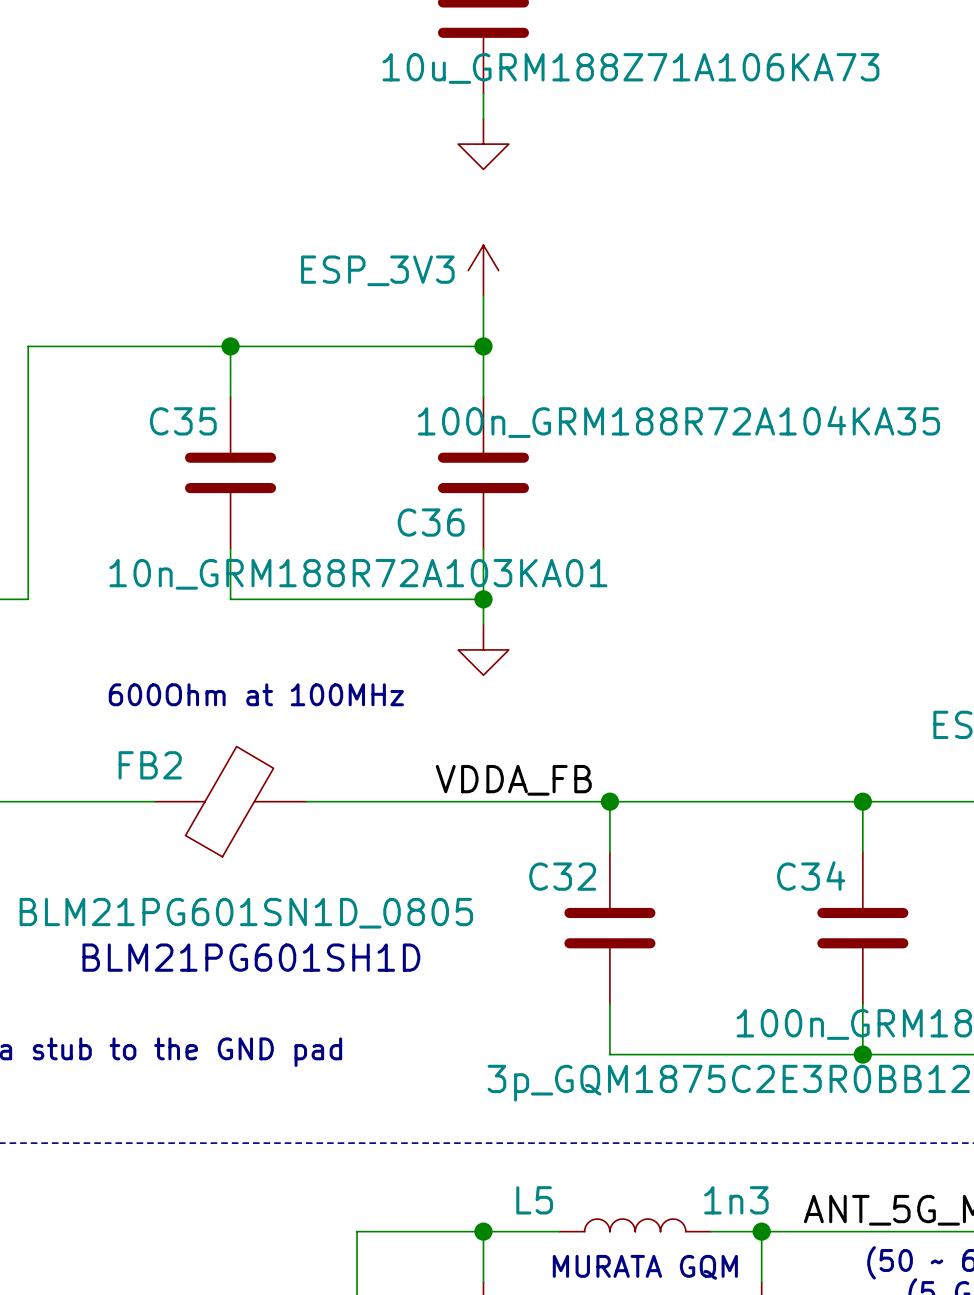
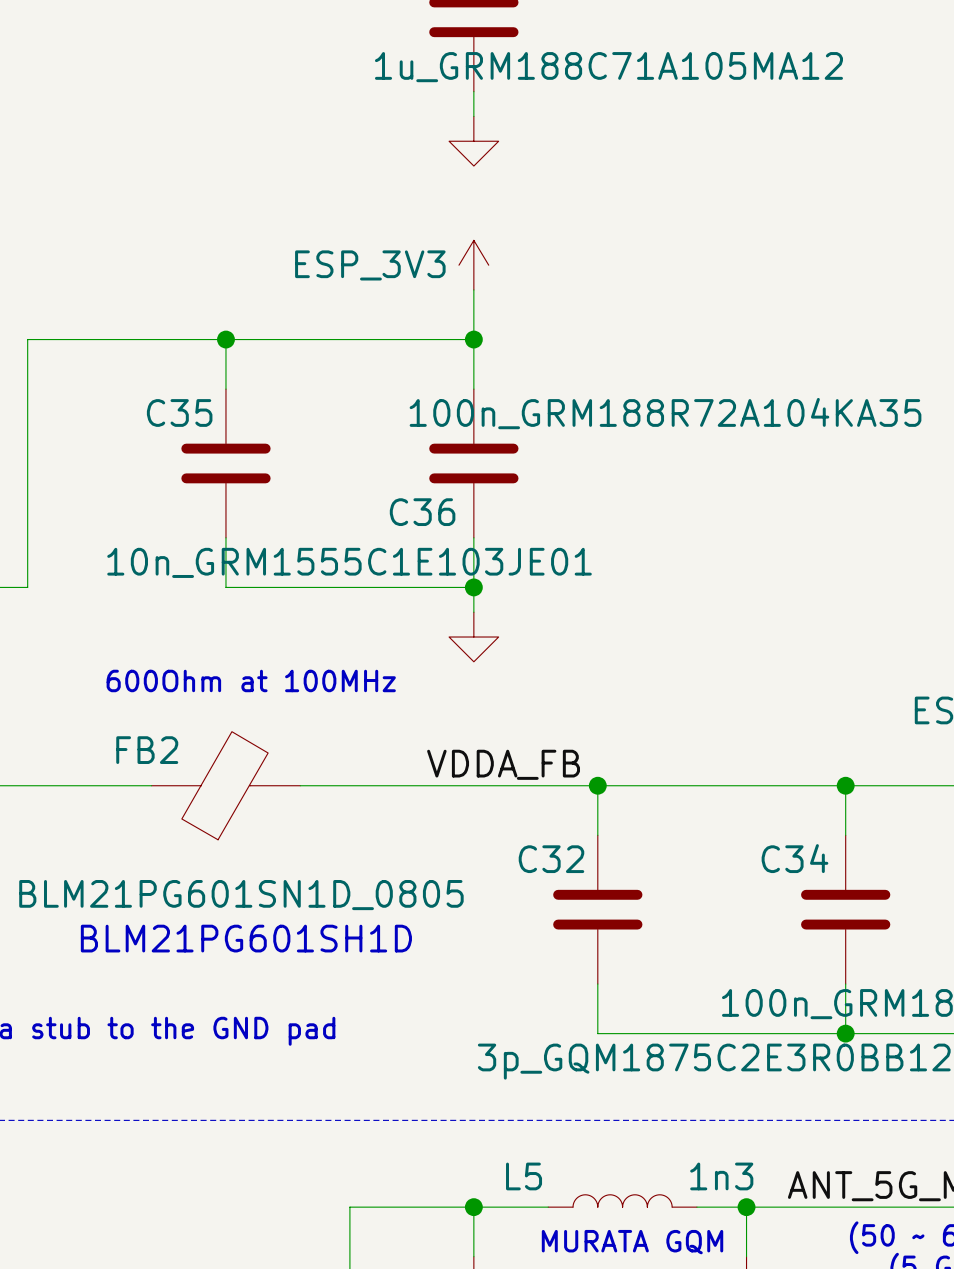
part value: 10u_GRM188Z71A106KA73 (630, 68) -> 1u_GRM188C71A105MA12 (608, 67)
C35 value: 10n_GRM188R72A103KA01 (358, 574) -> 10n_GRM1555C1E103JE01 (349, 562)

